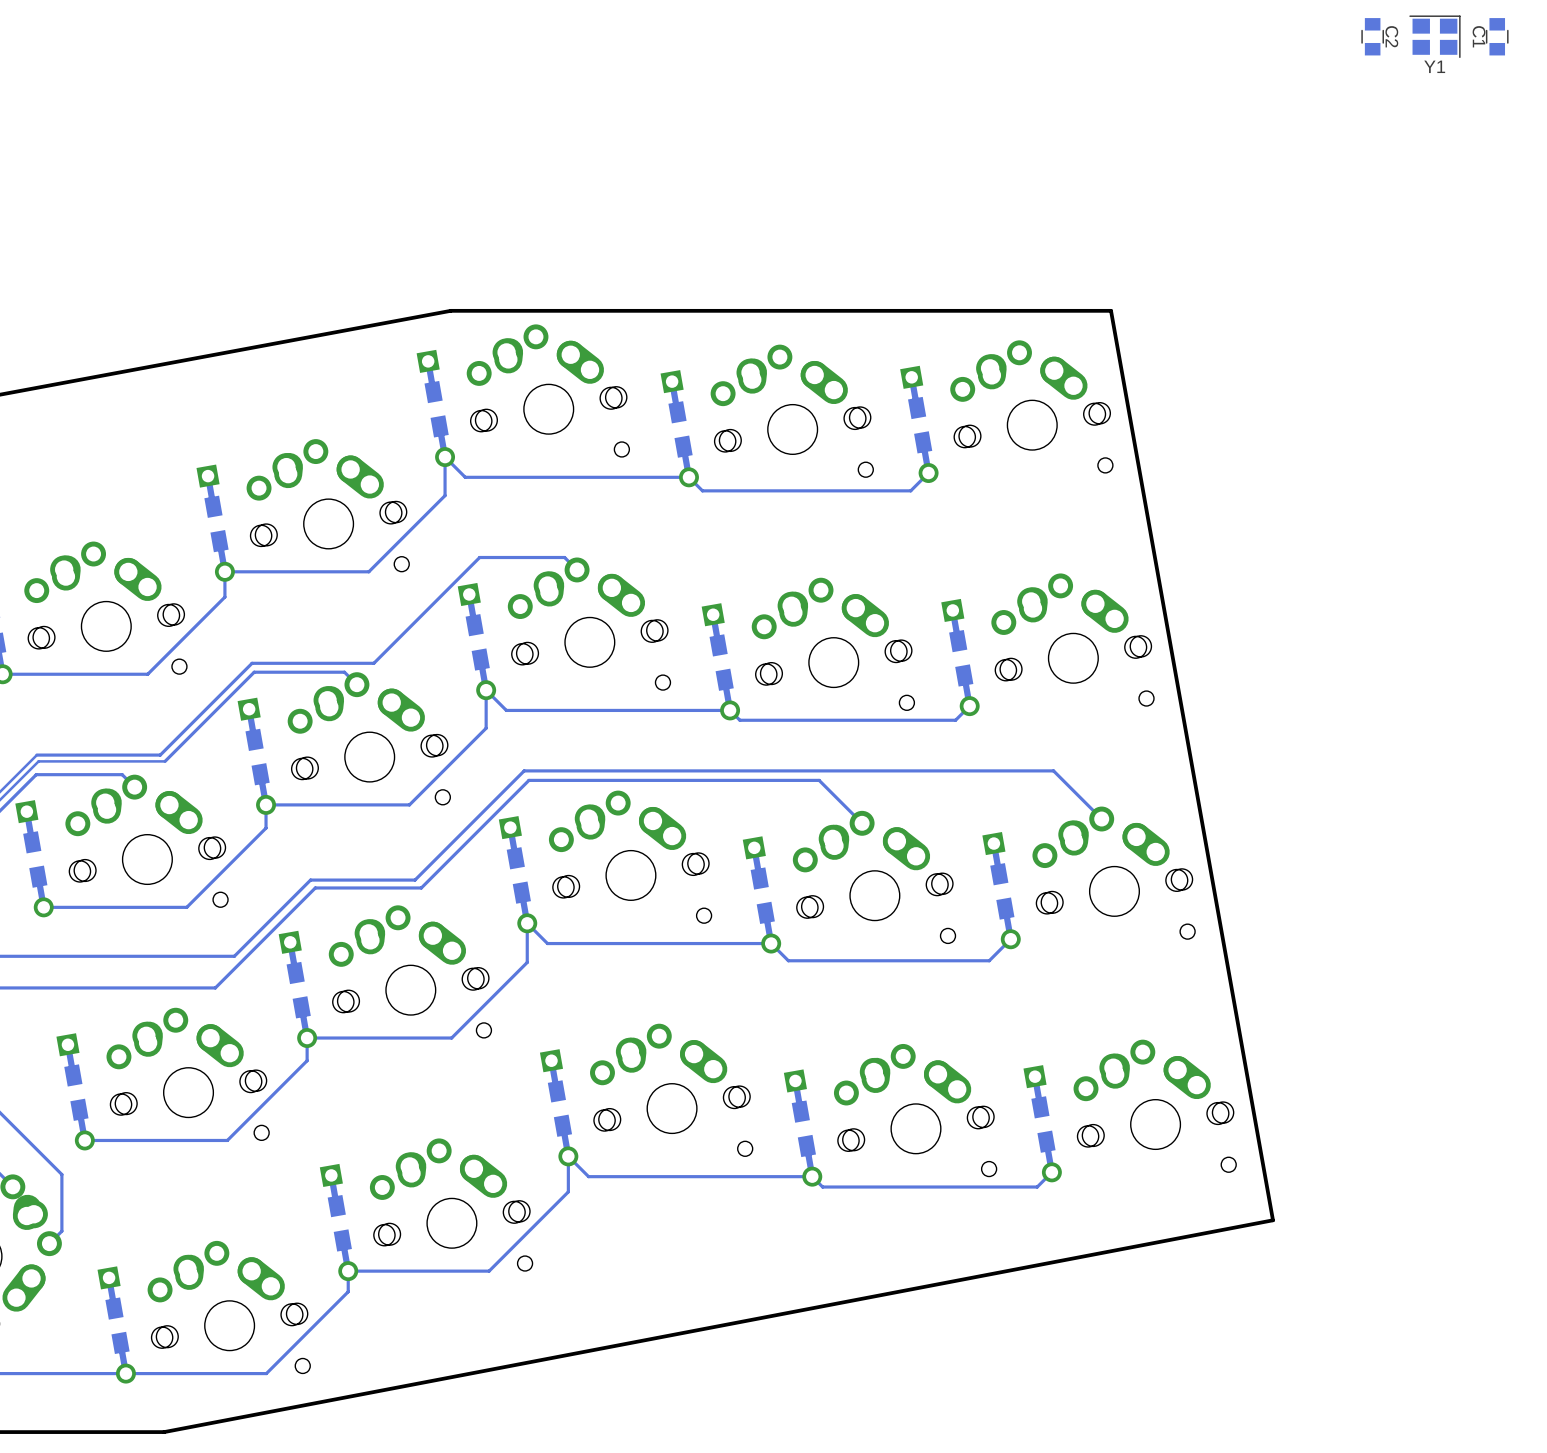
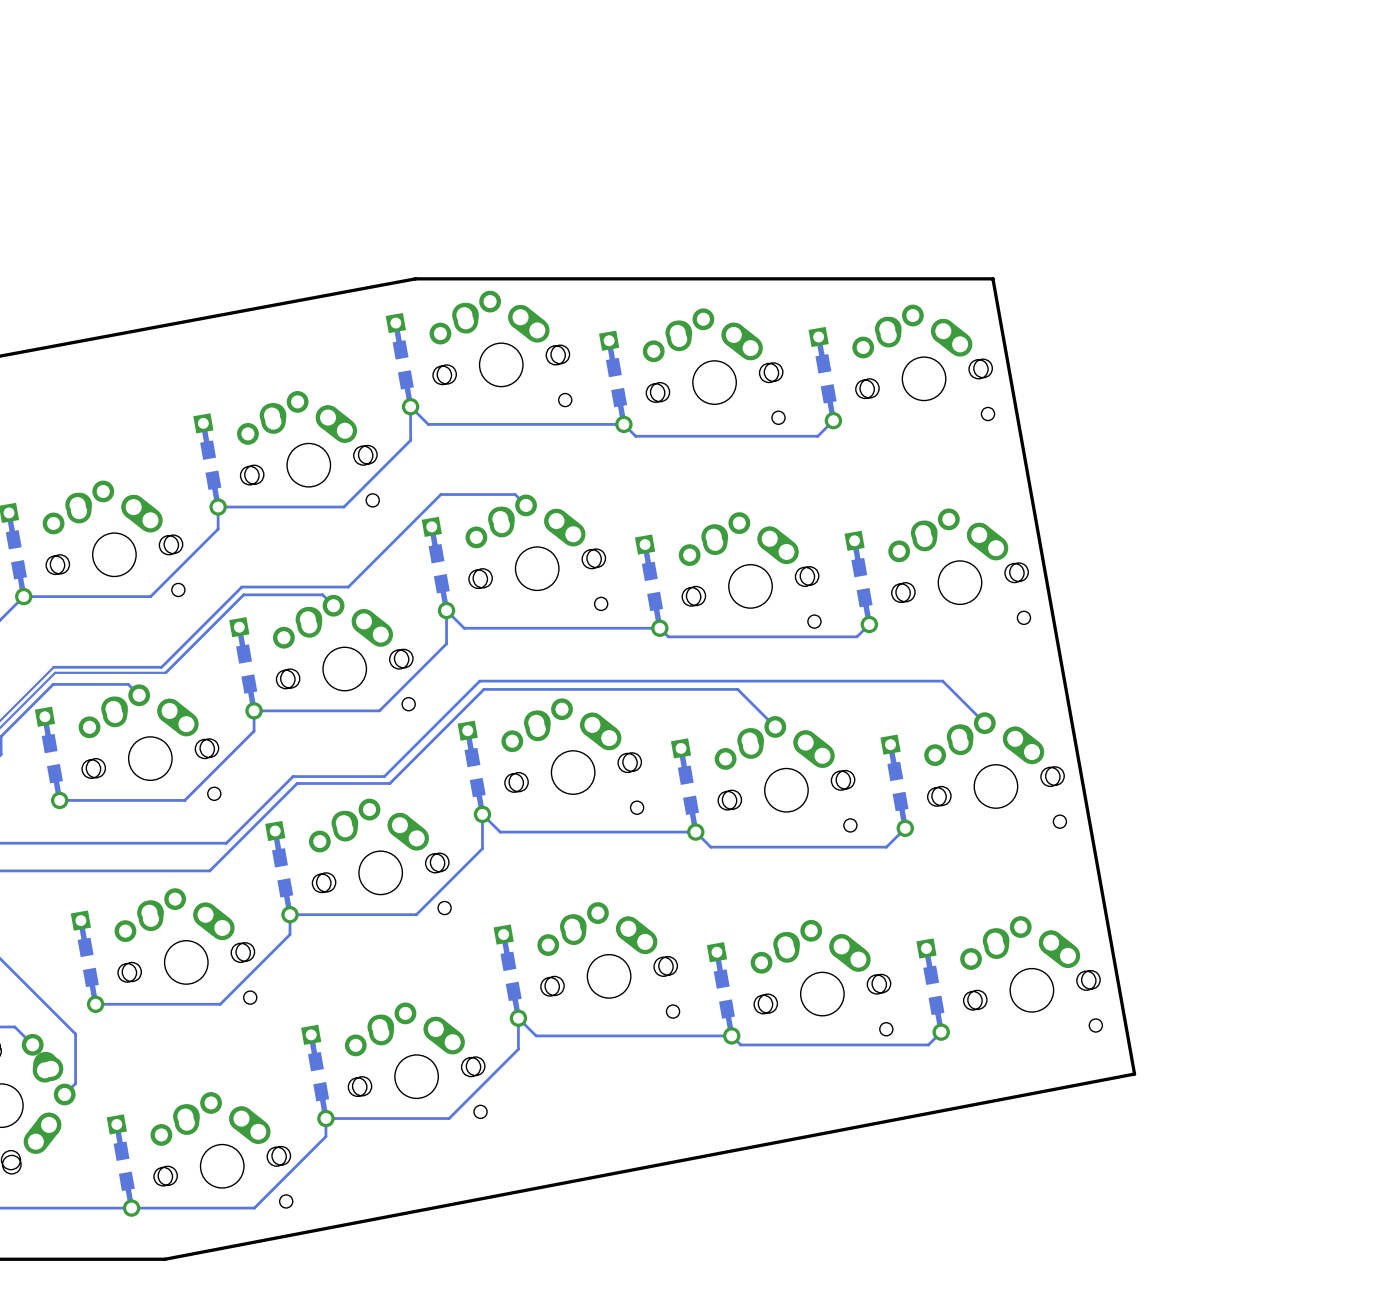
C2: (1372, 36) -> none
Y1: (1434, 36) -> none
C1: (1497, 36) -> none

